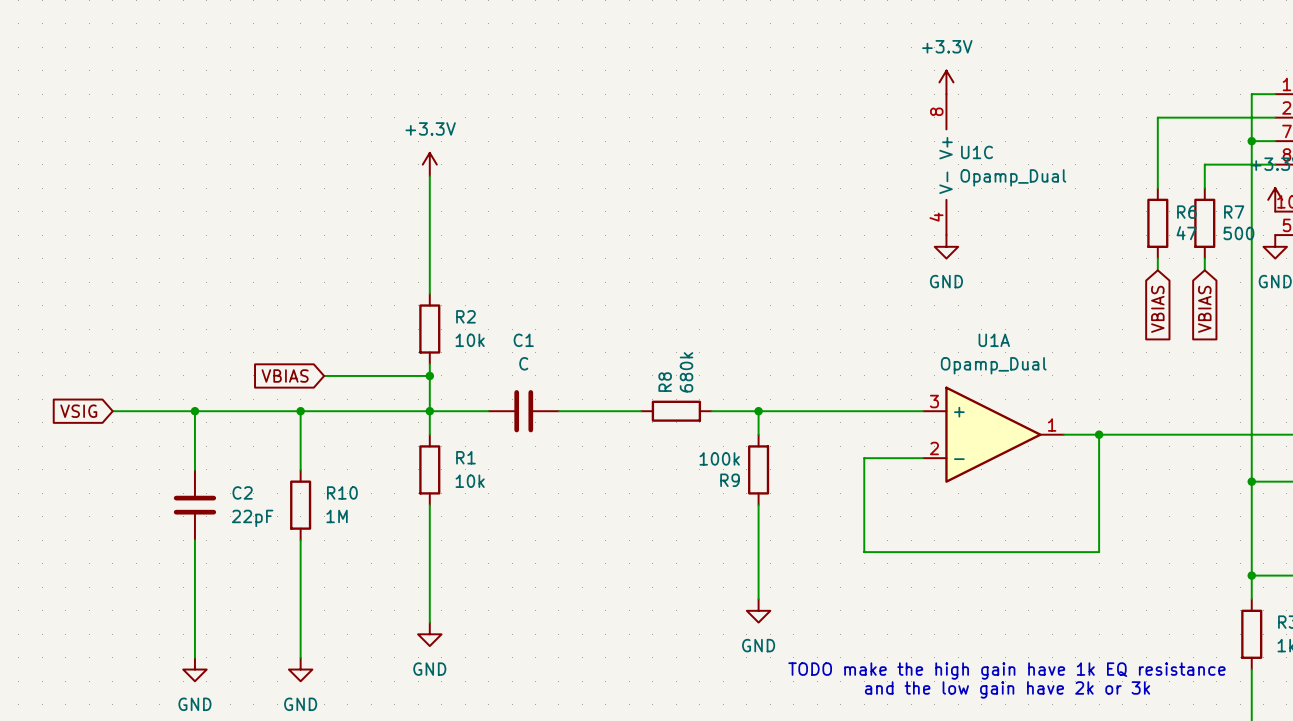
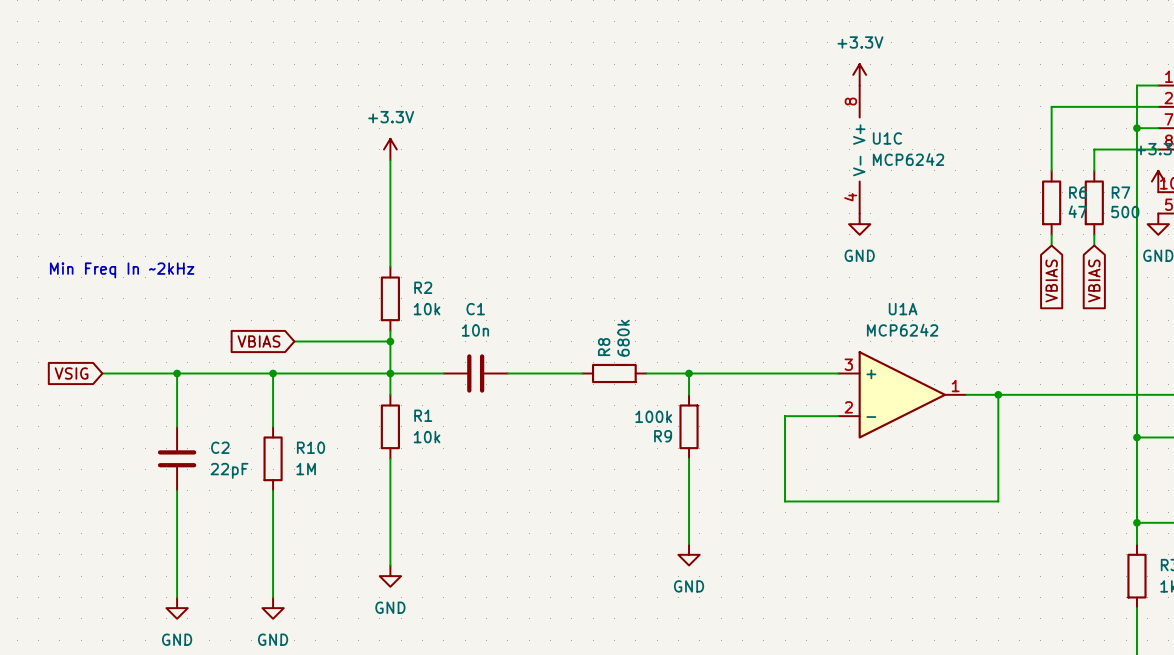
U1C value: Opamp_Dual (1013, 177) -> MCP6242 (908, 159)
text: none -> Min Freq In ~2kHz (122, 270)
C1 value: C (523, 363) -> 10n (475, 330)
U1A value: Opamp_Dual (993, 365) -> MCP6242 (902, 330)
text: TODO make the high gain have 1k EQ resistance (1006, 671) -> none
text: and the low gain have 2k or 3k (1007, 689) -> none

